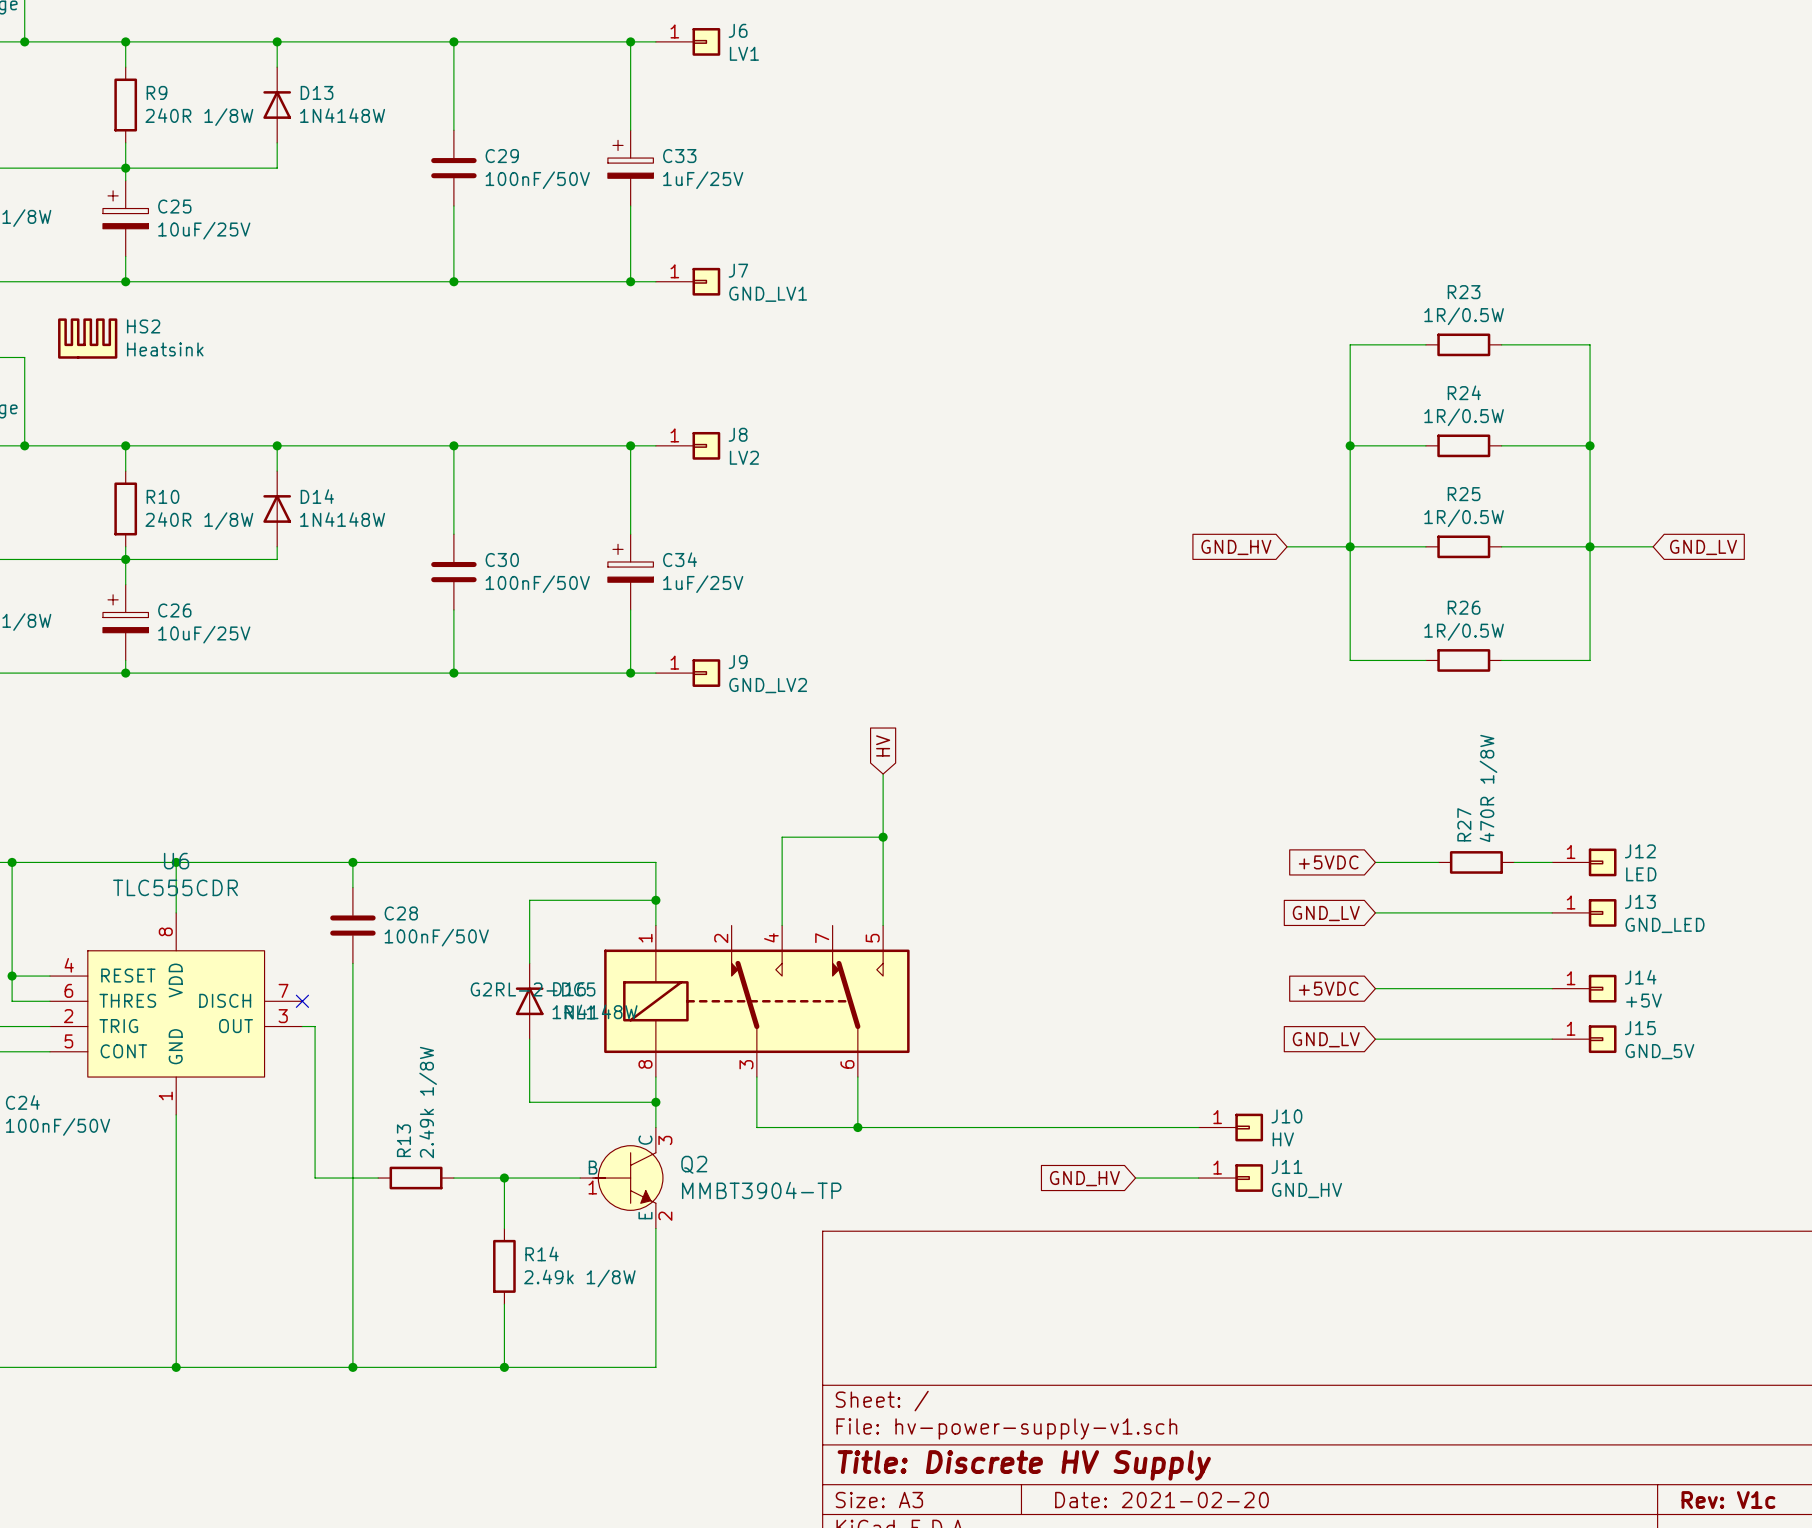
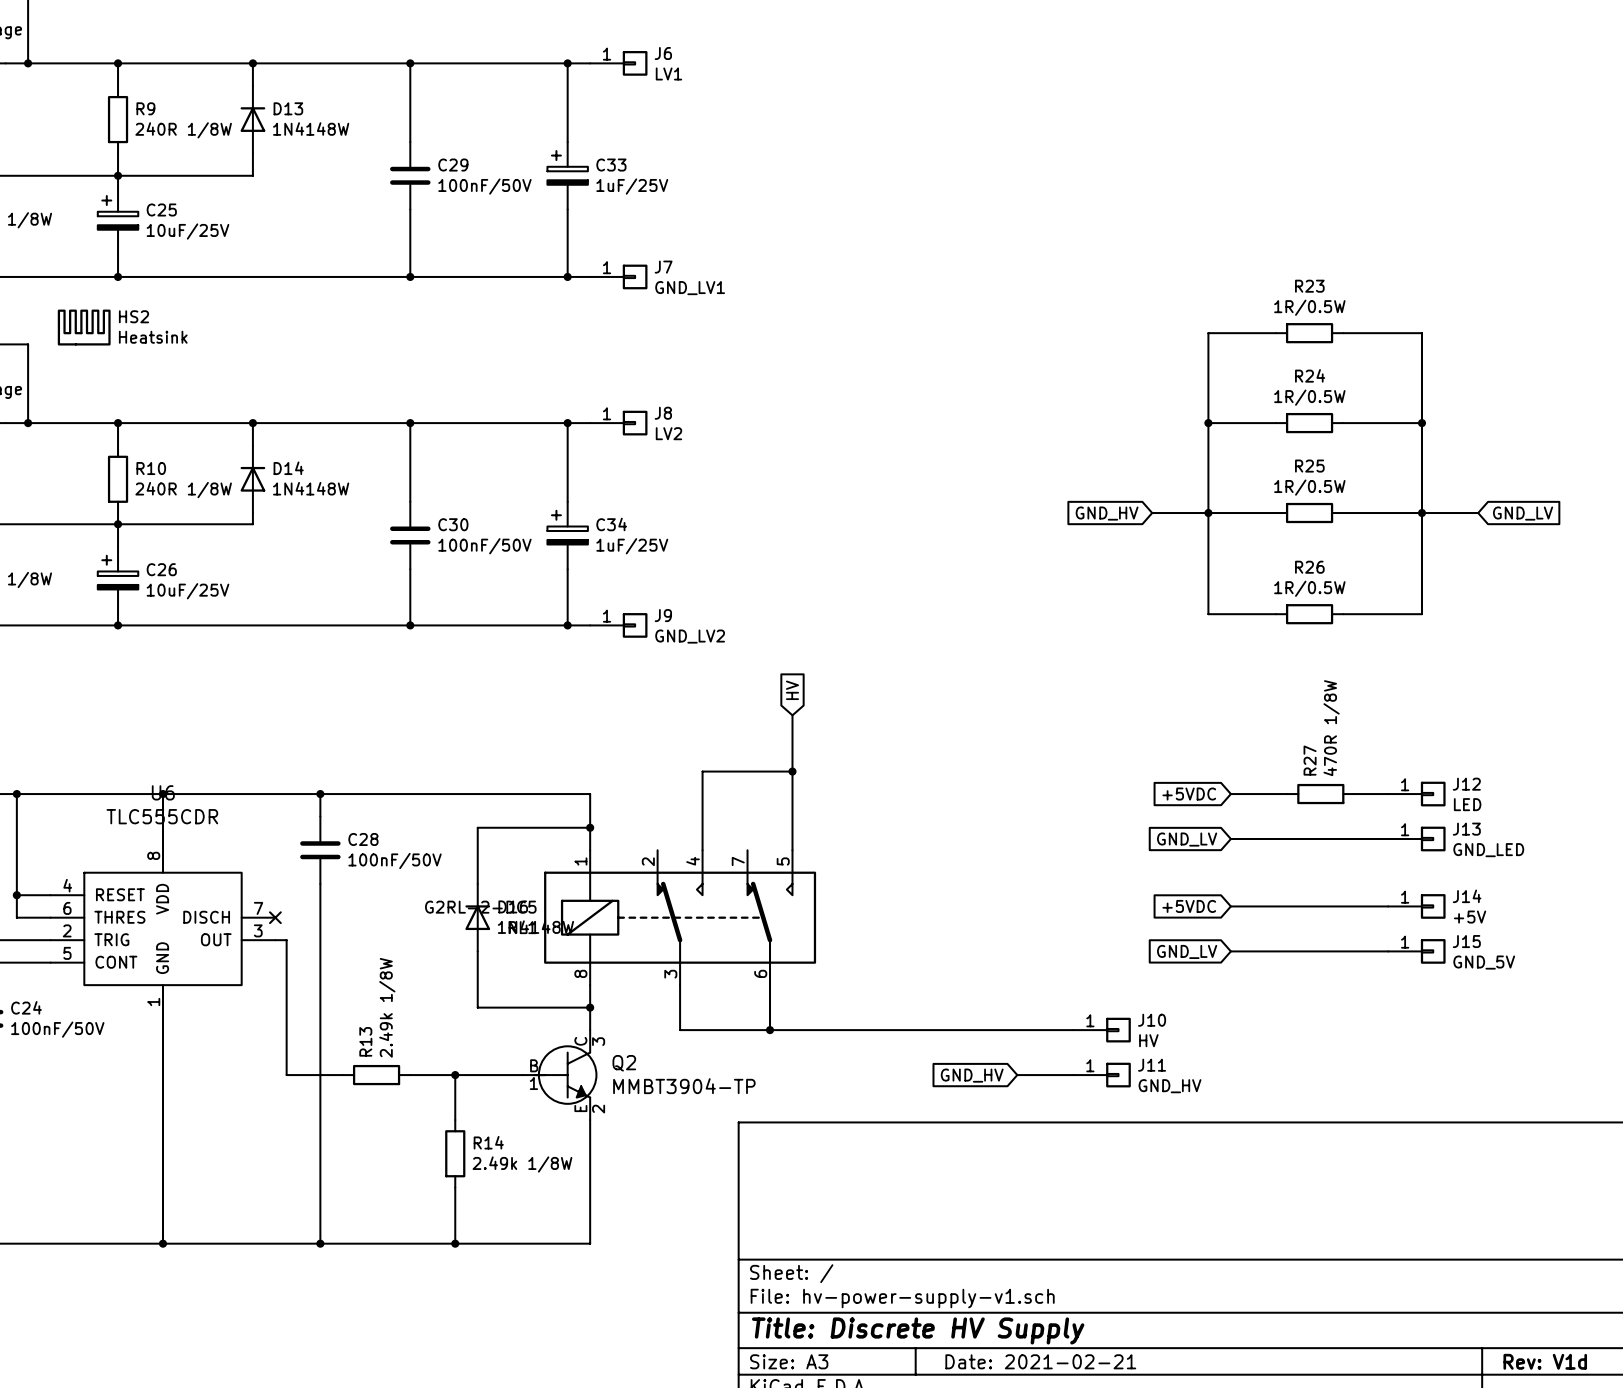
title block: Date: 2021-02-20 (1161, 1500) -> Date: 2021-02-21 (1040, 1361)
title block: Rev: V1c (1728, 1500) -> Rev: V1d (1545, 1361)

